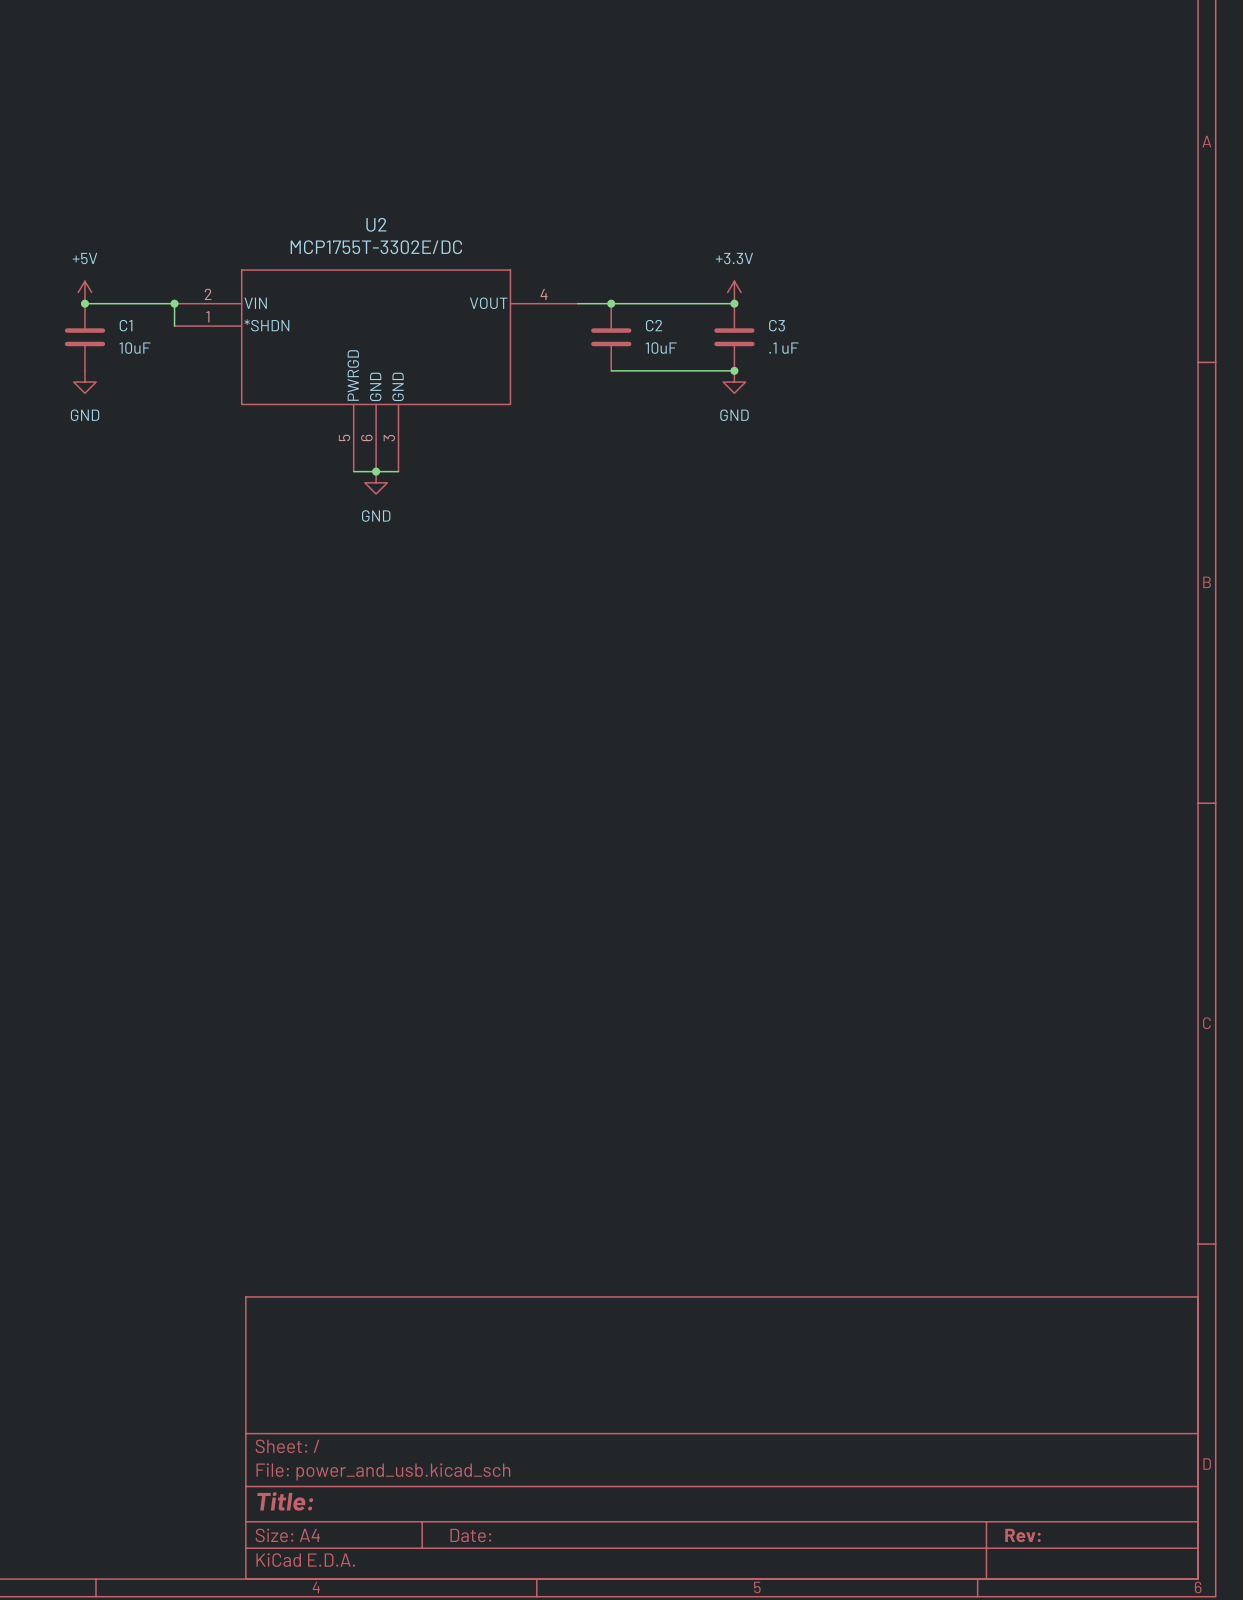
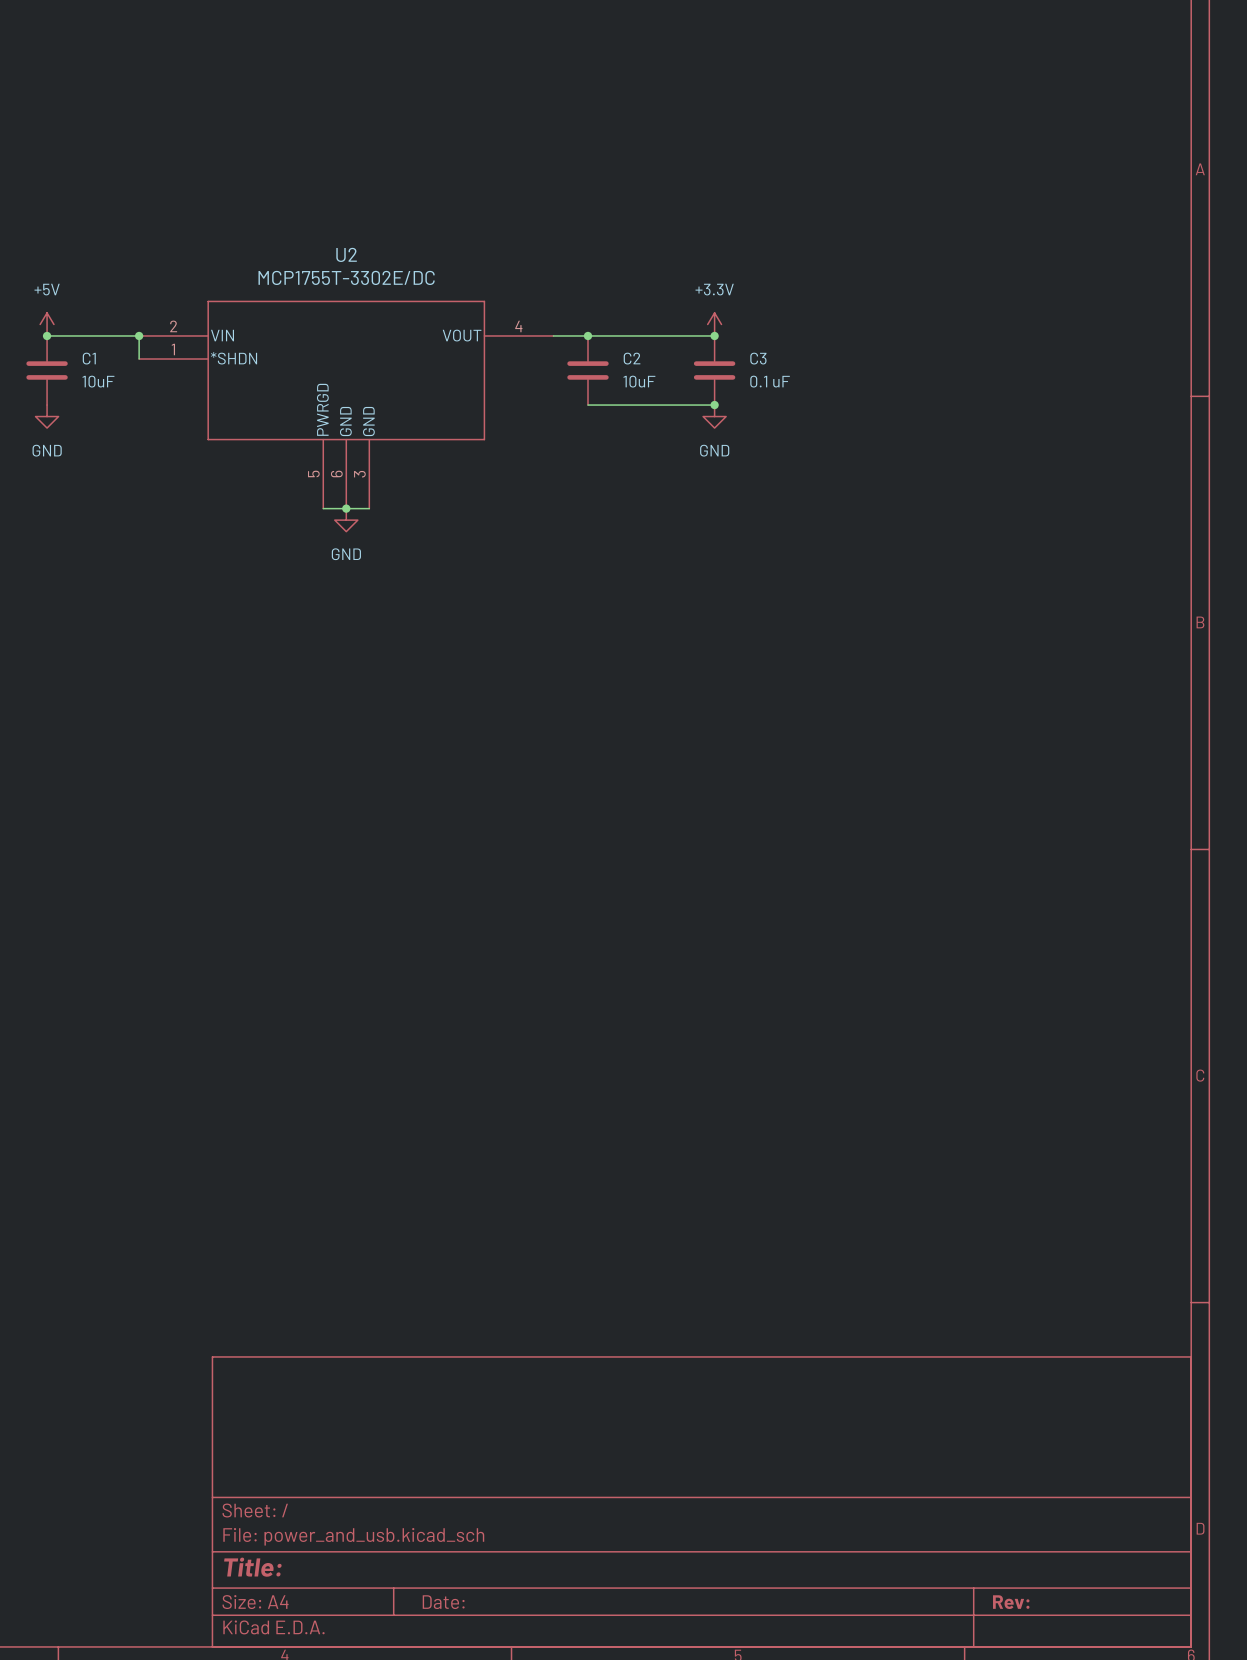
C3 value: .1 uF (783, 348) -> 0.1 uF (770, 381)

